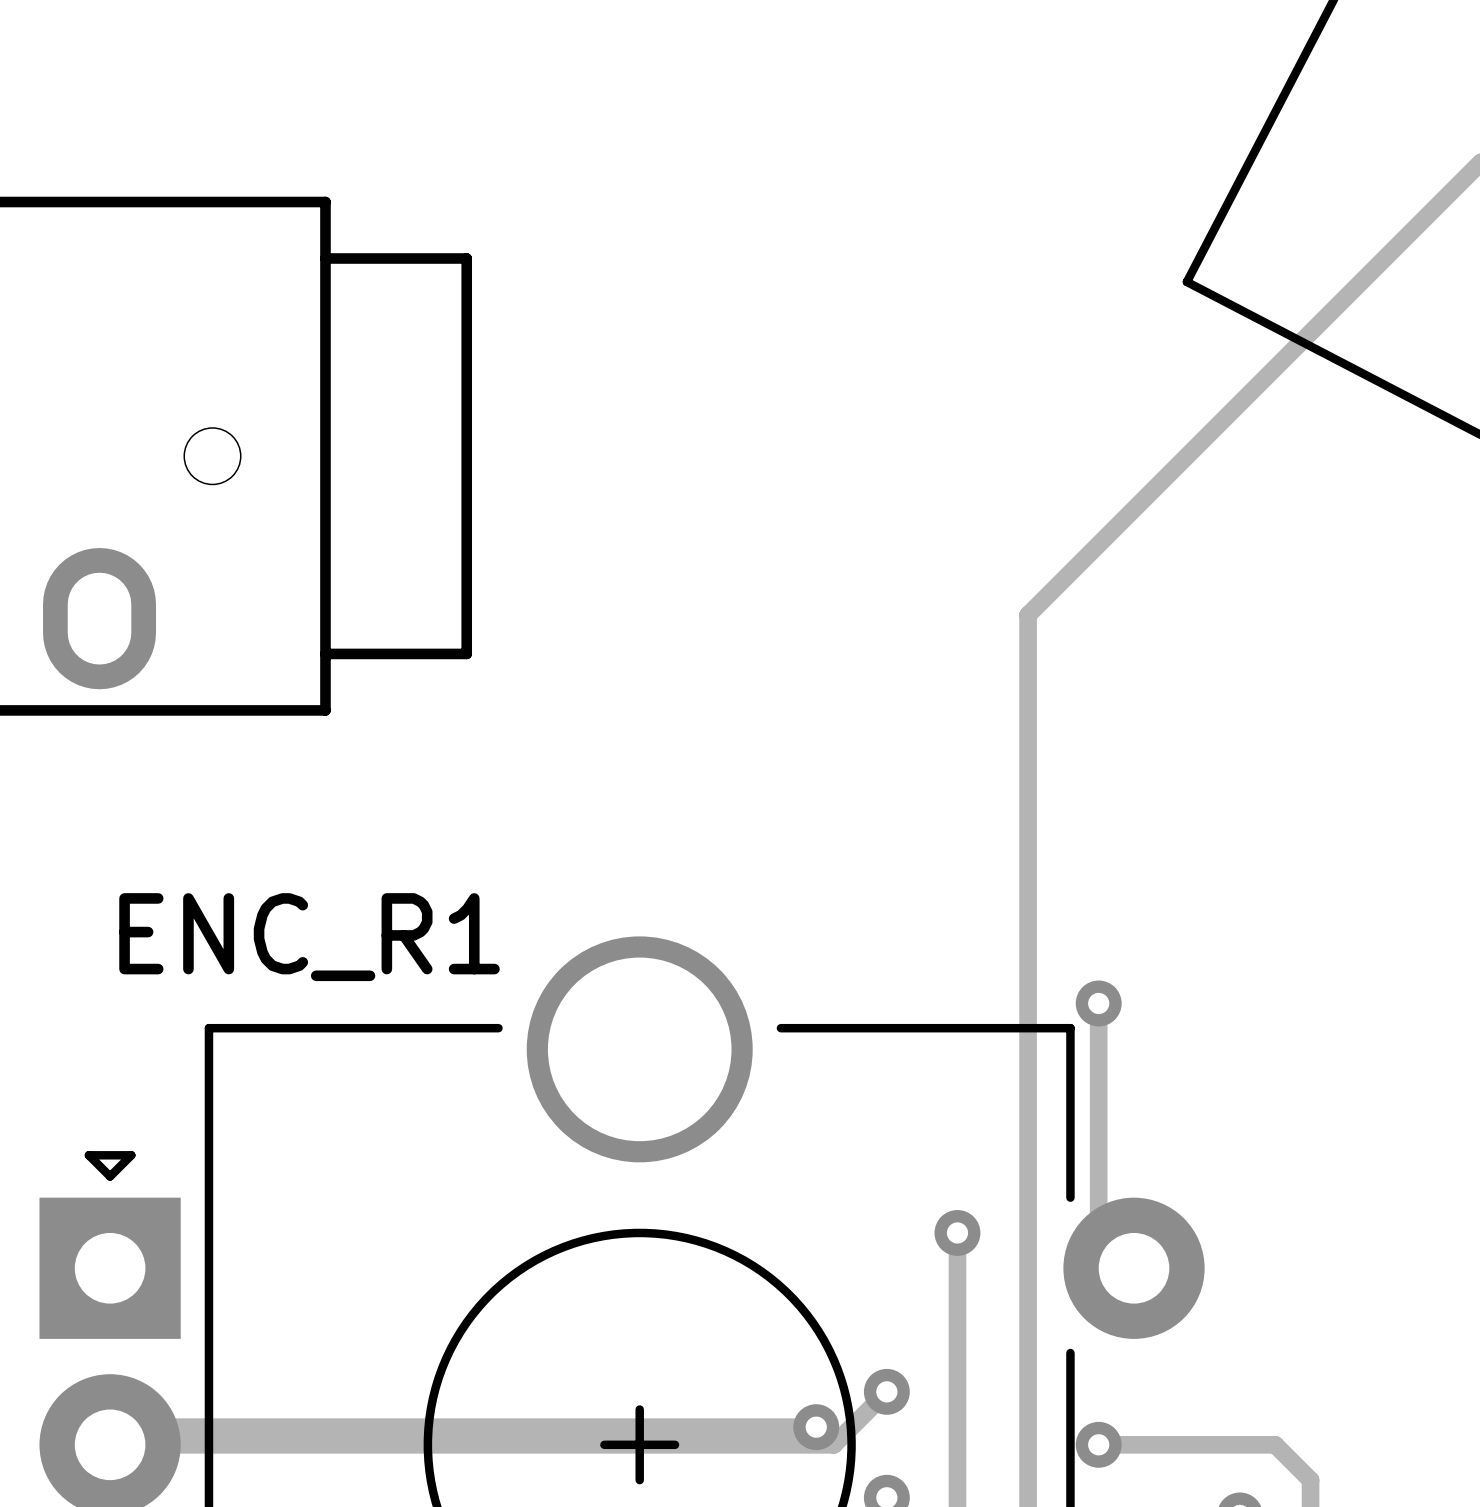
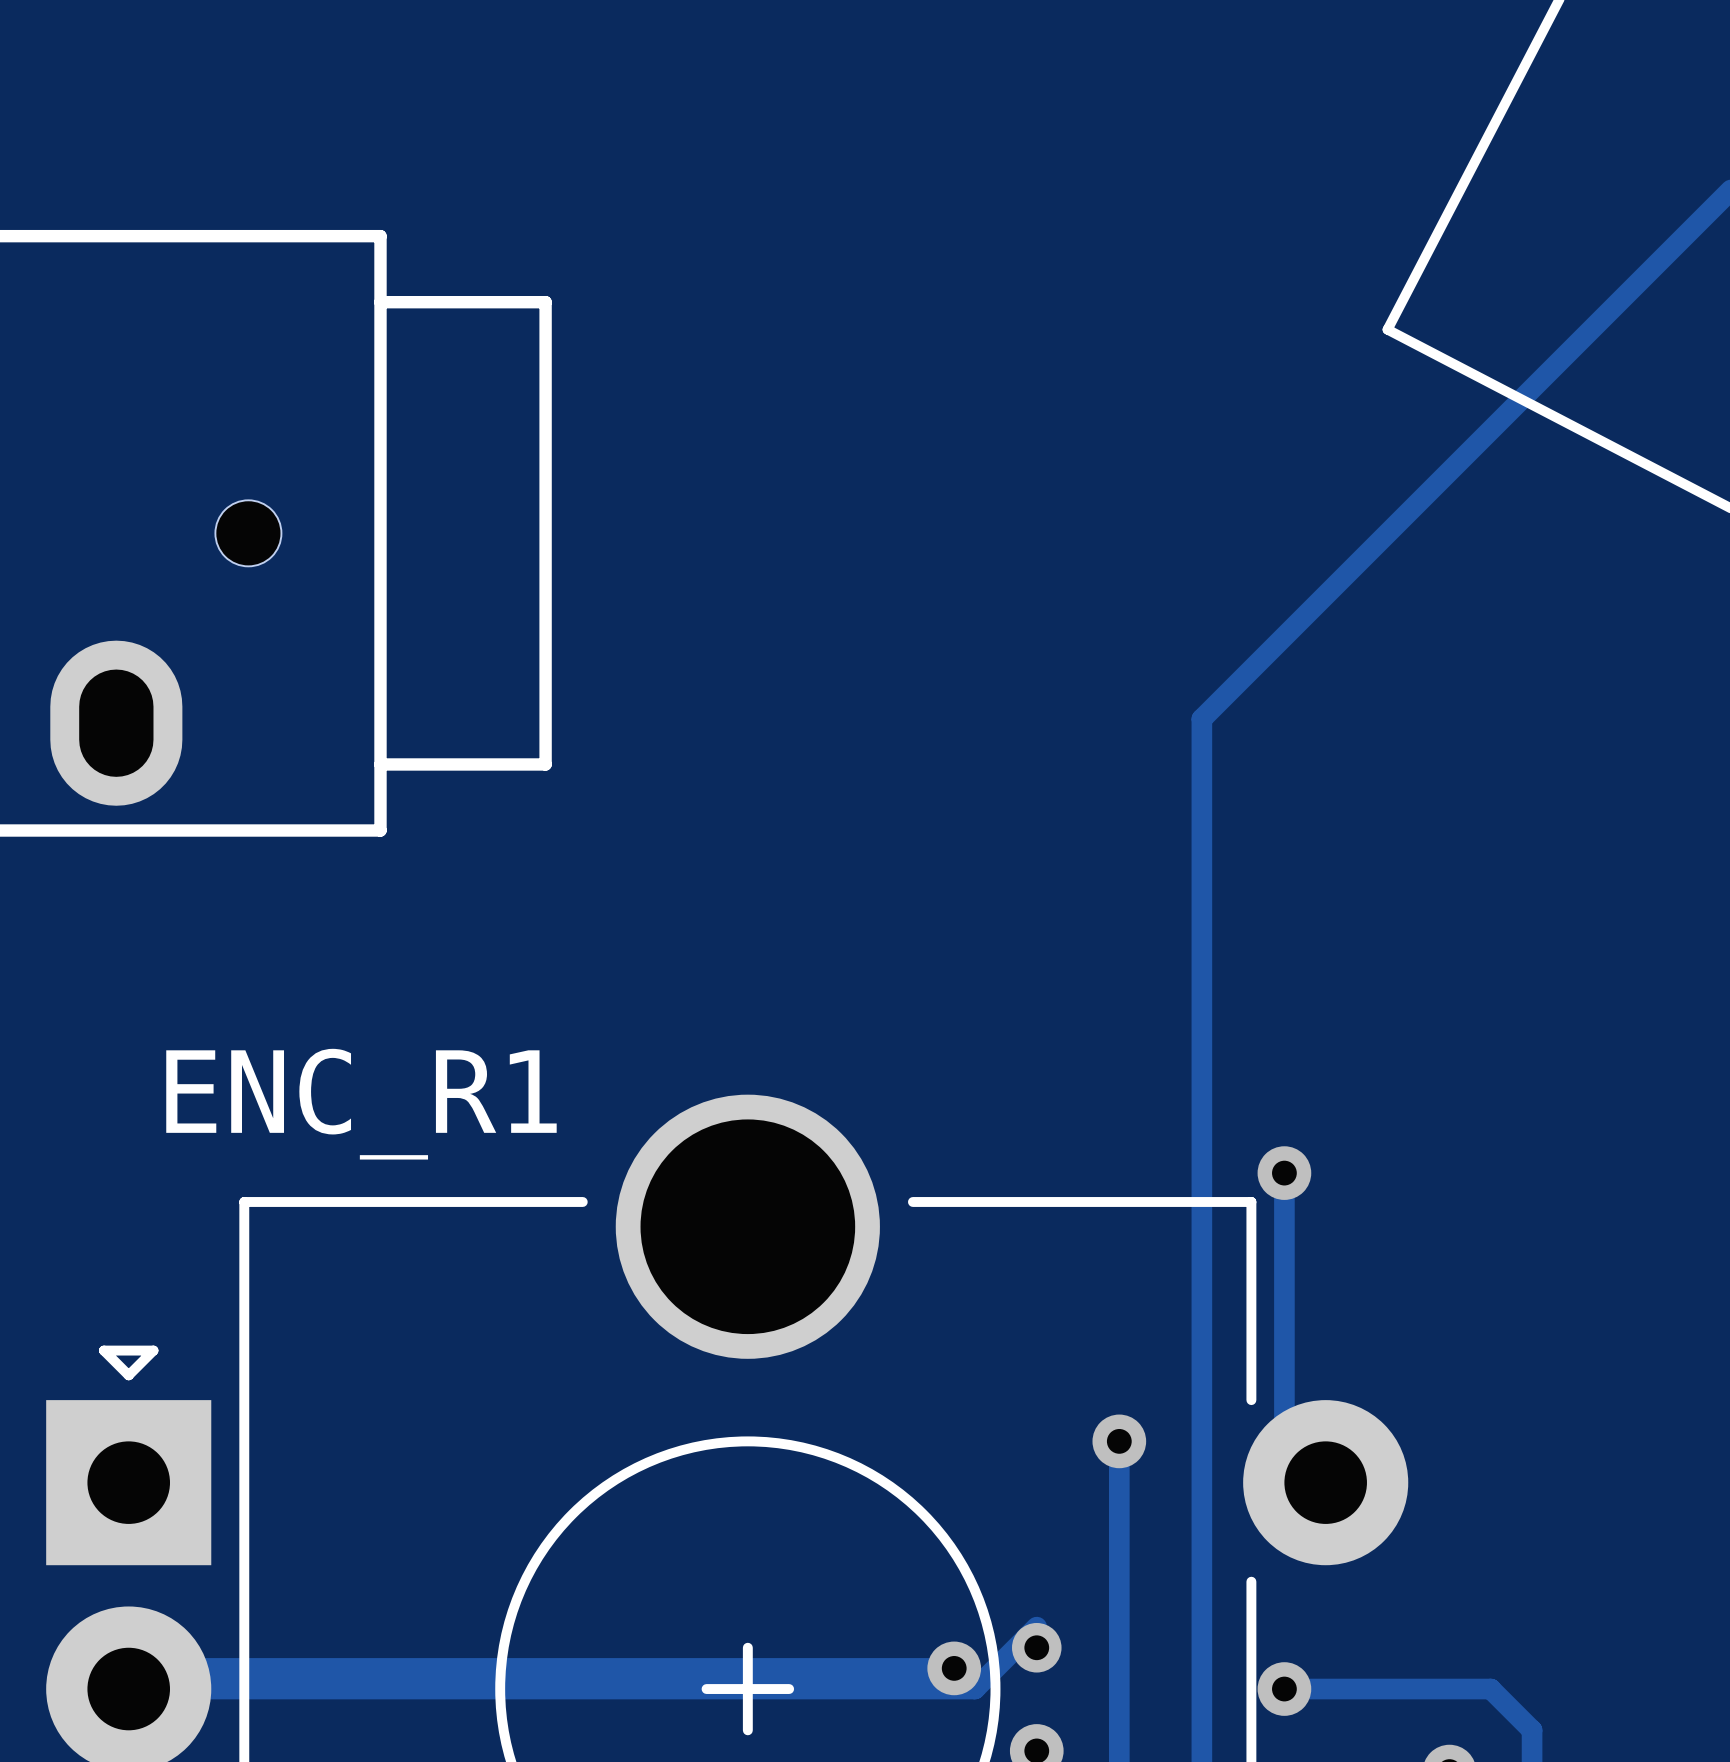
via position: (886, 1391) -> (1036, 1647)

